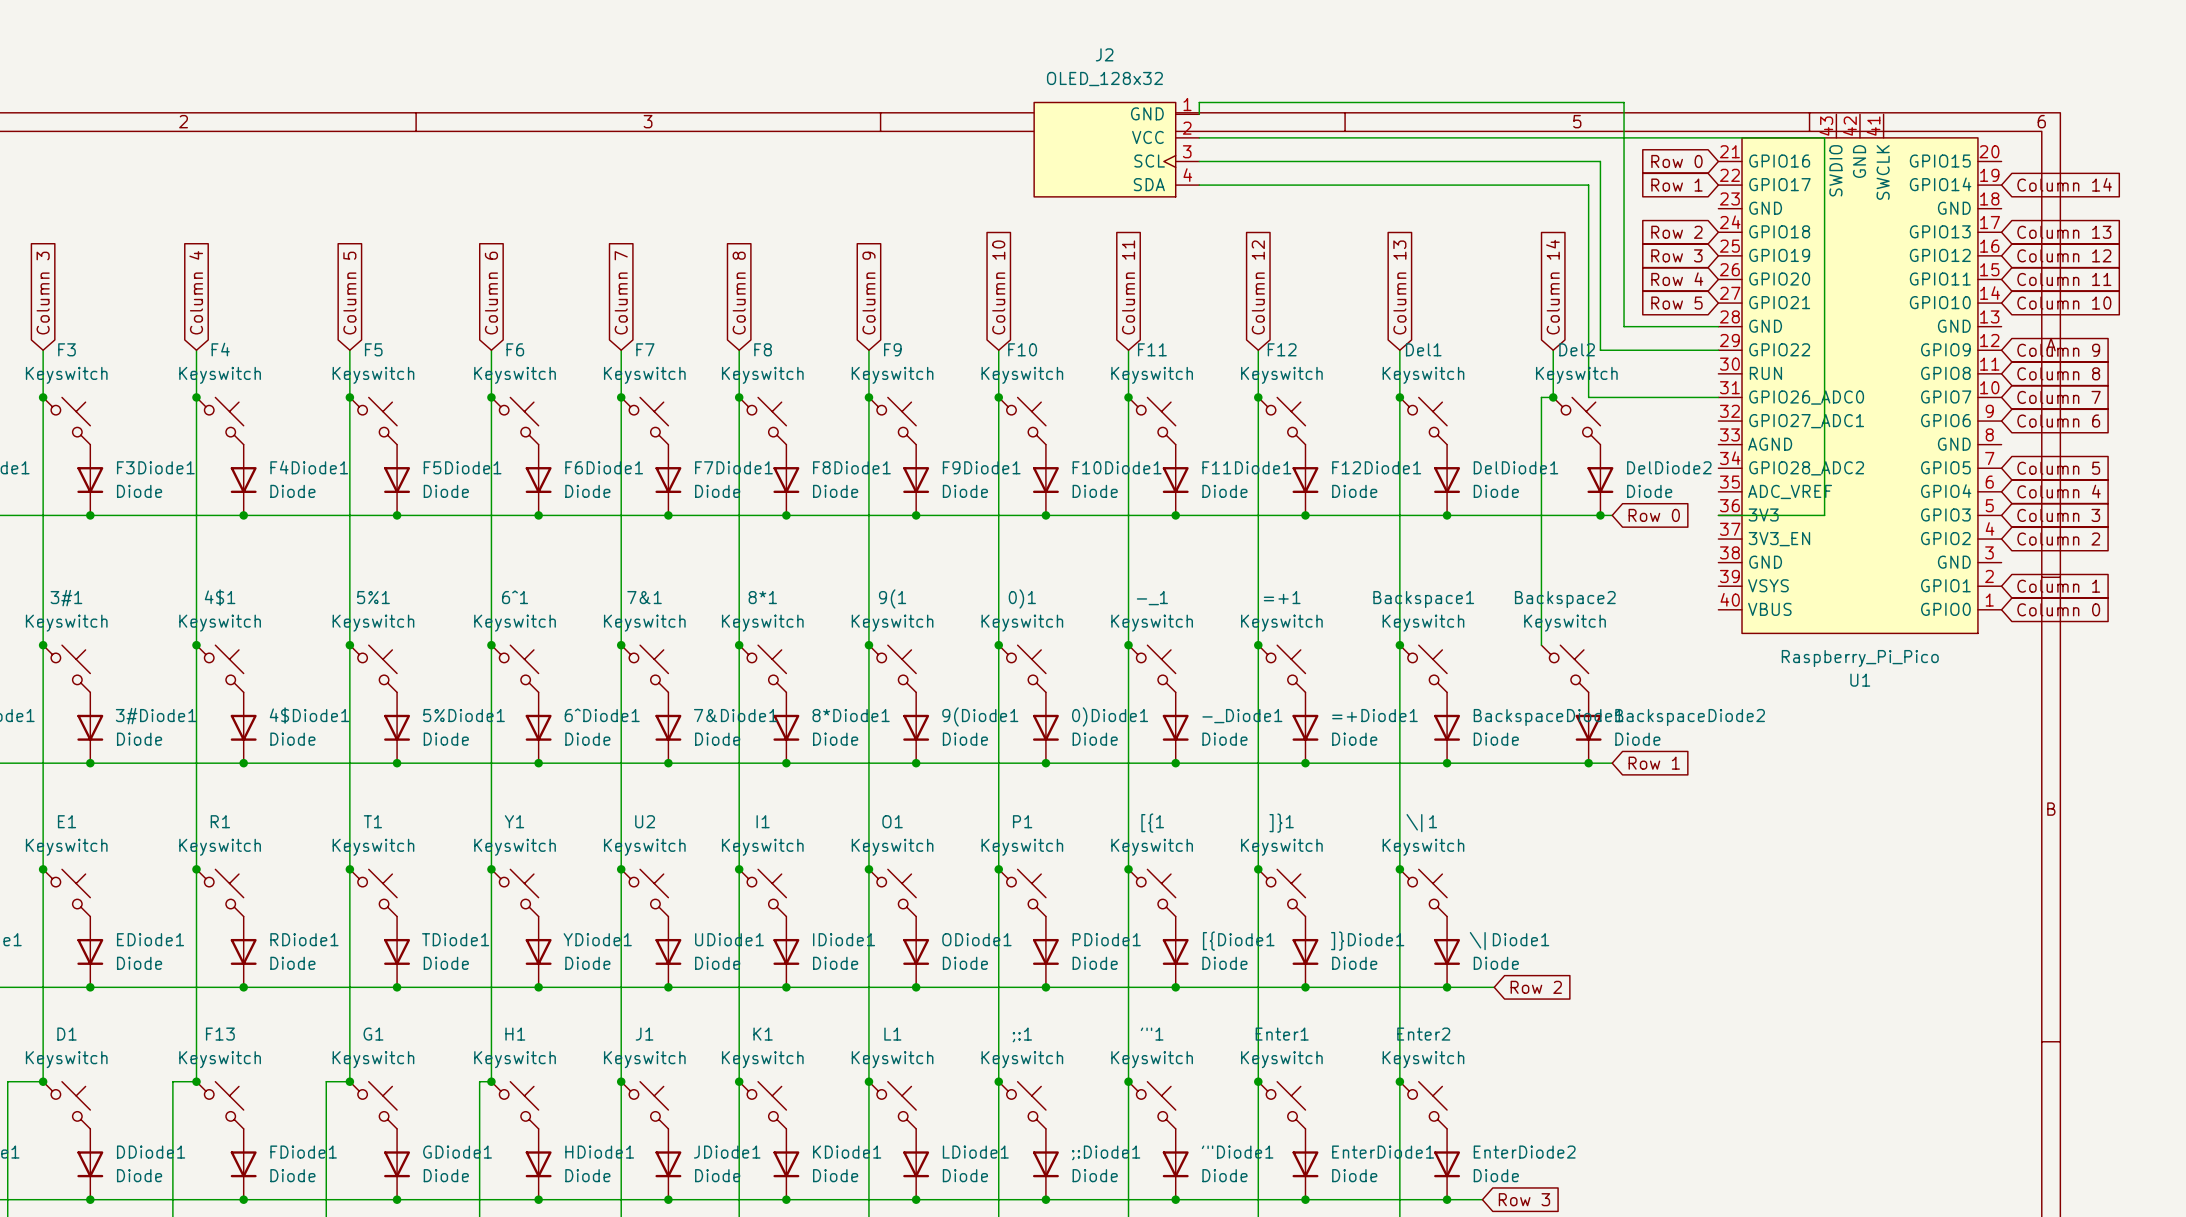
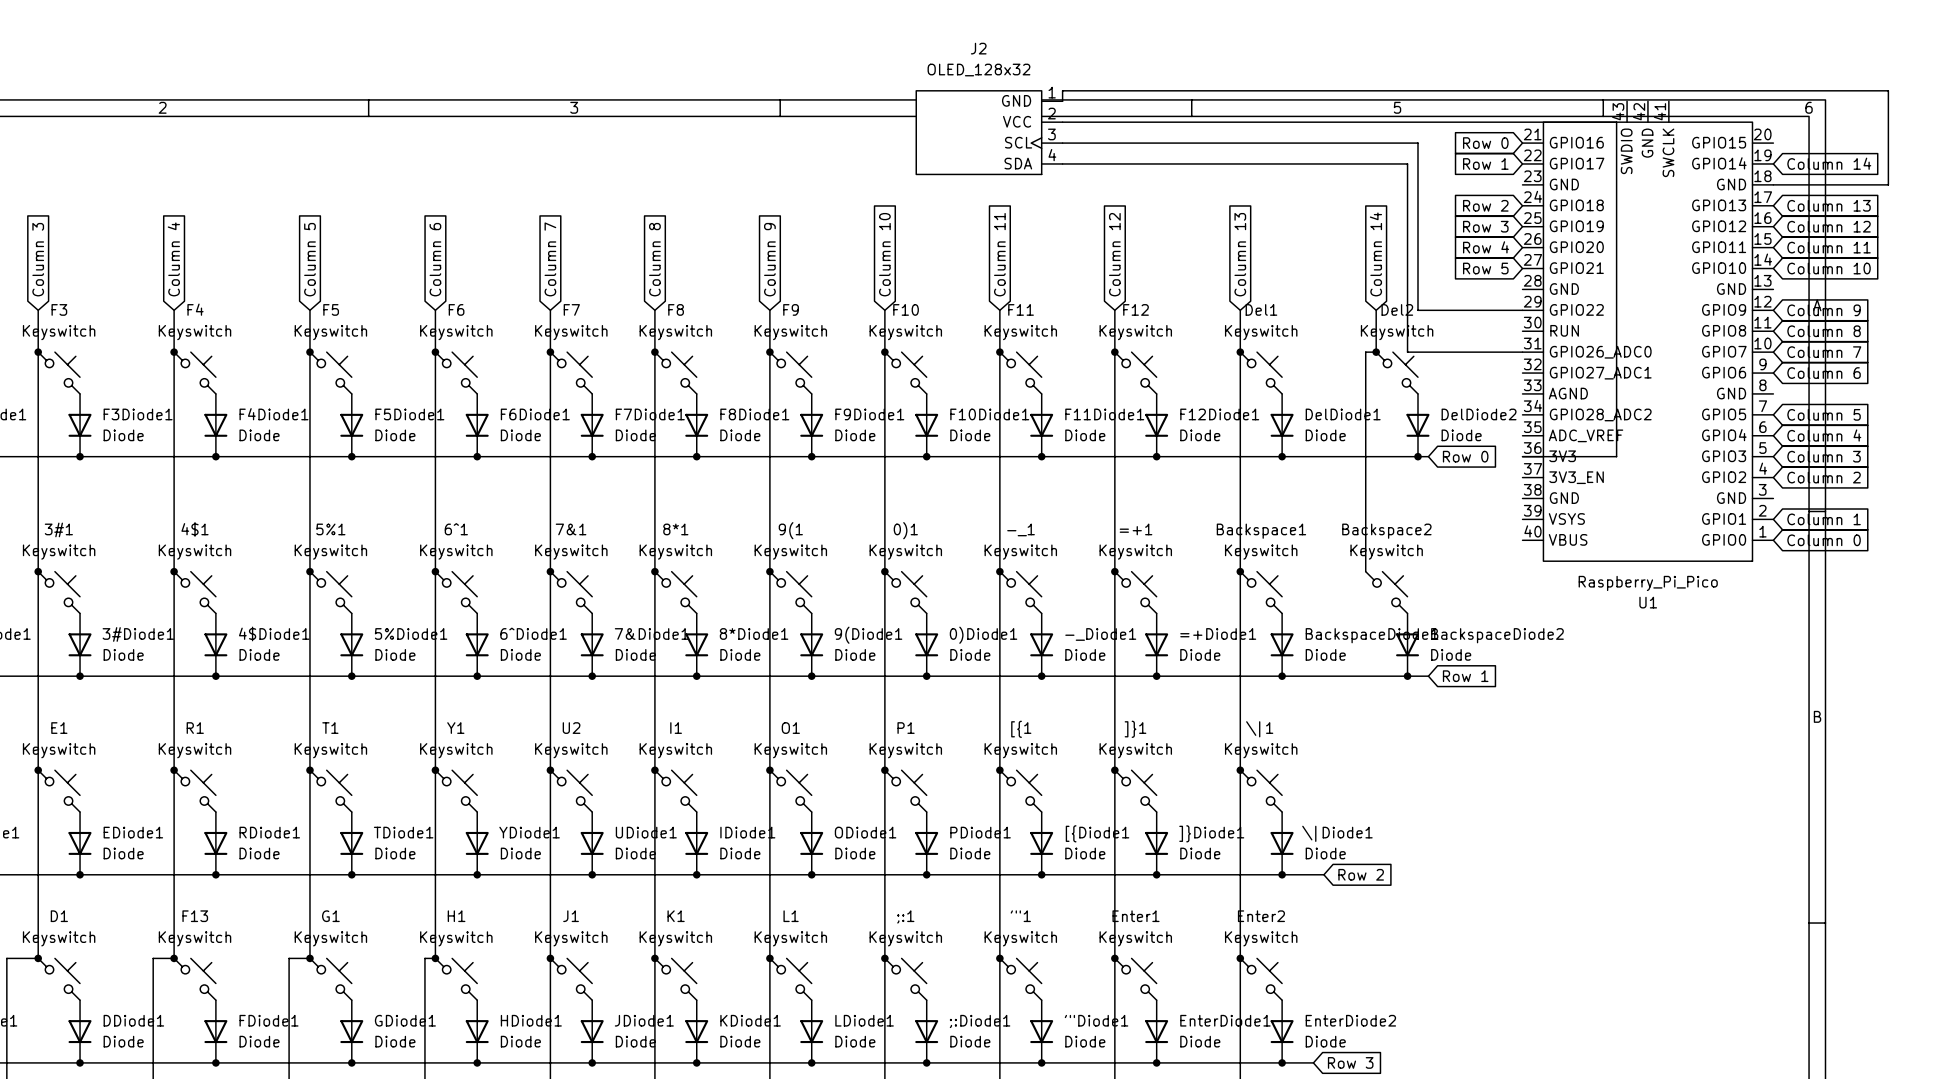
wire: (1624, 102) (1624, 326) (1718, 326) -> (1438, 90) (1888, 90) (1888, 184) (1773, 184)

